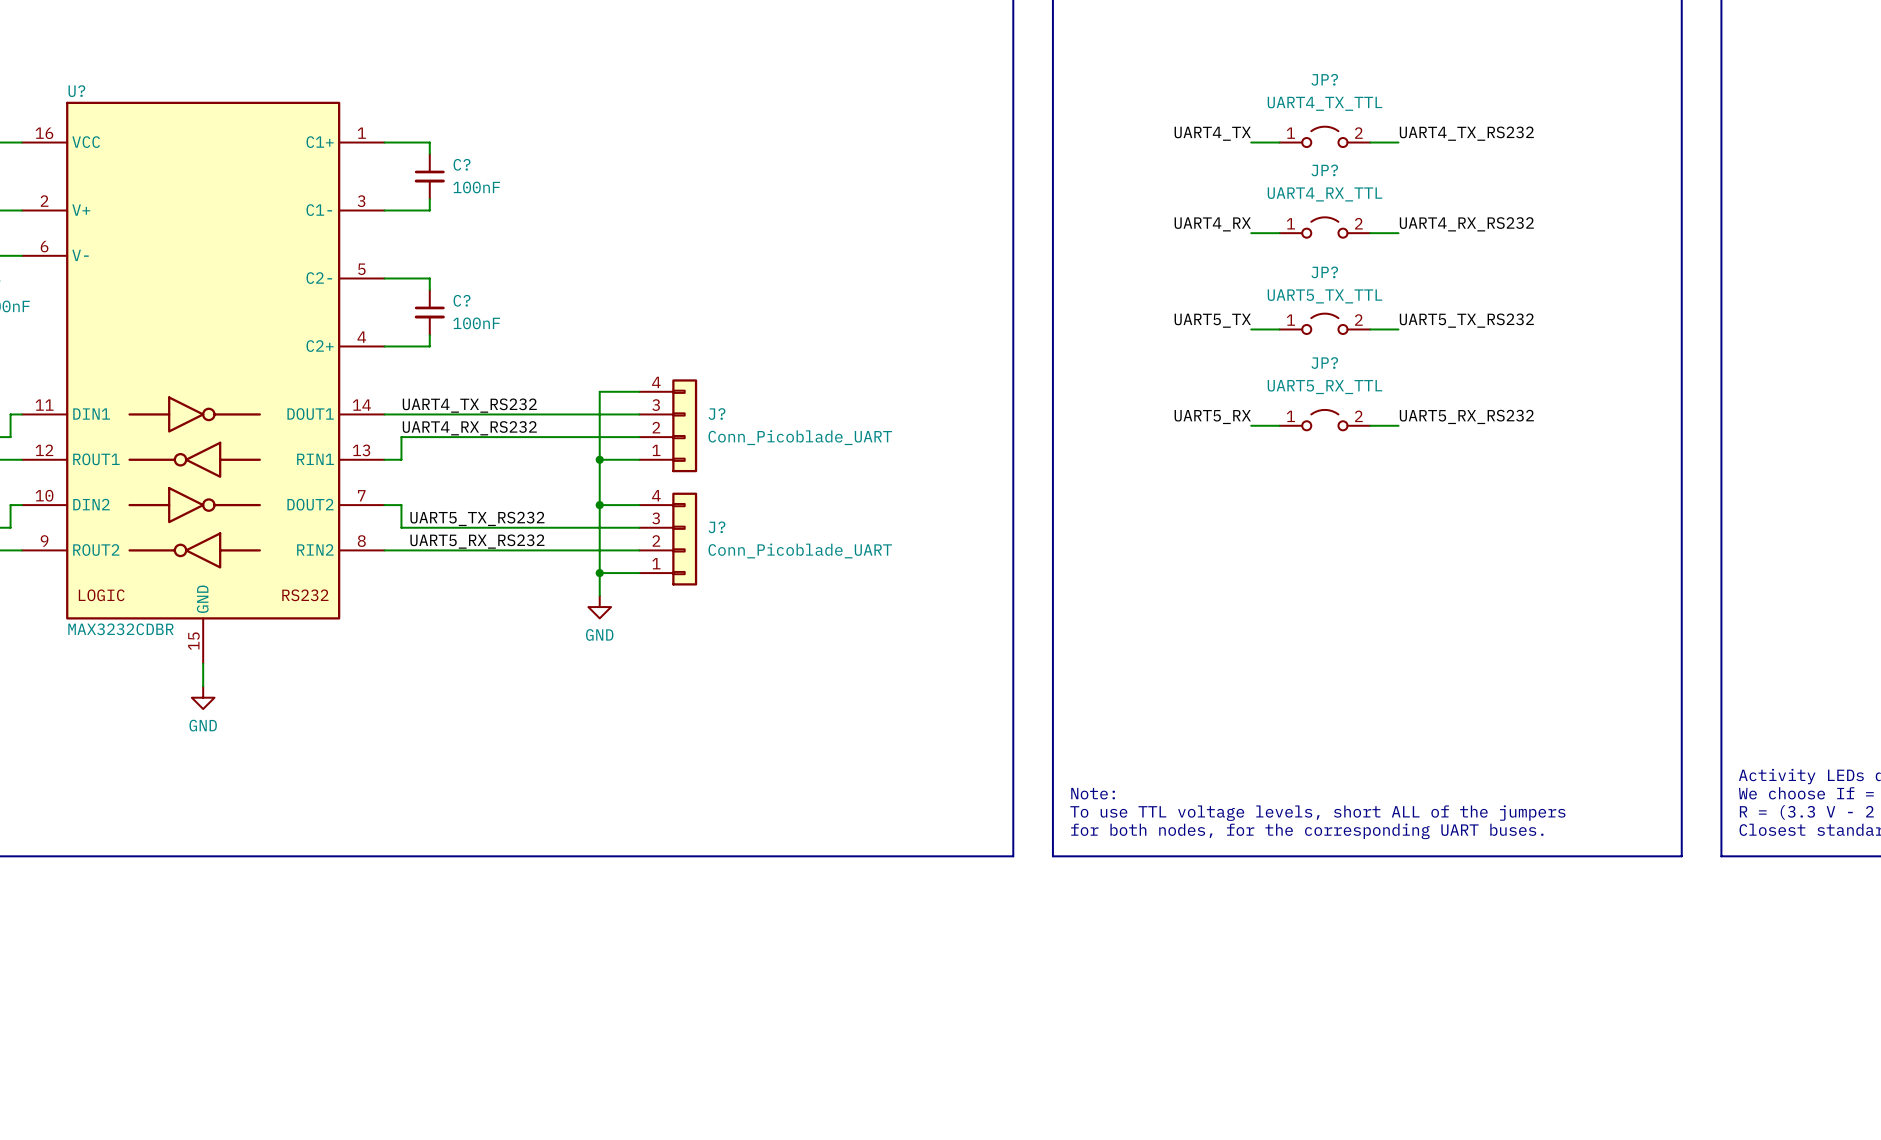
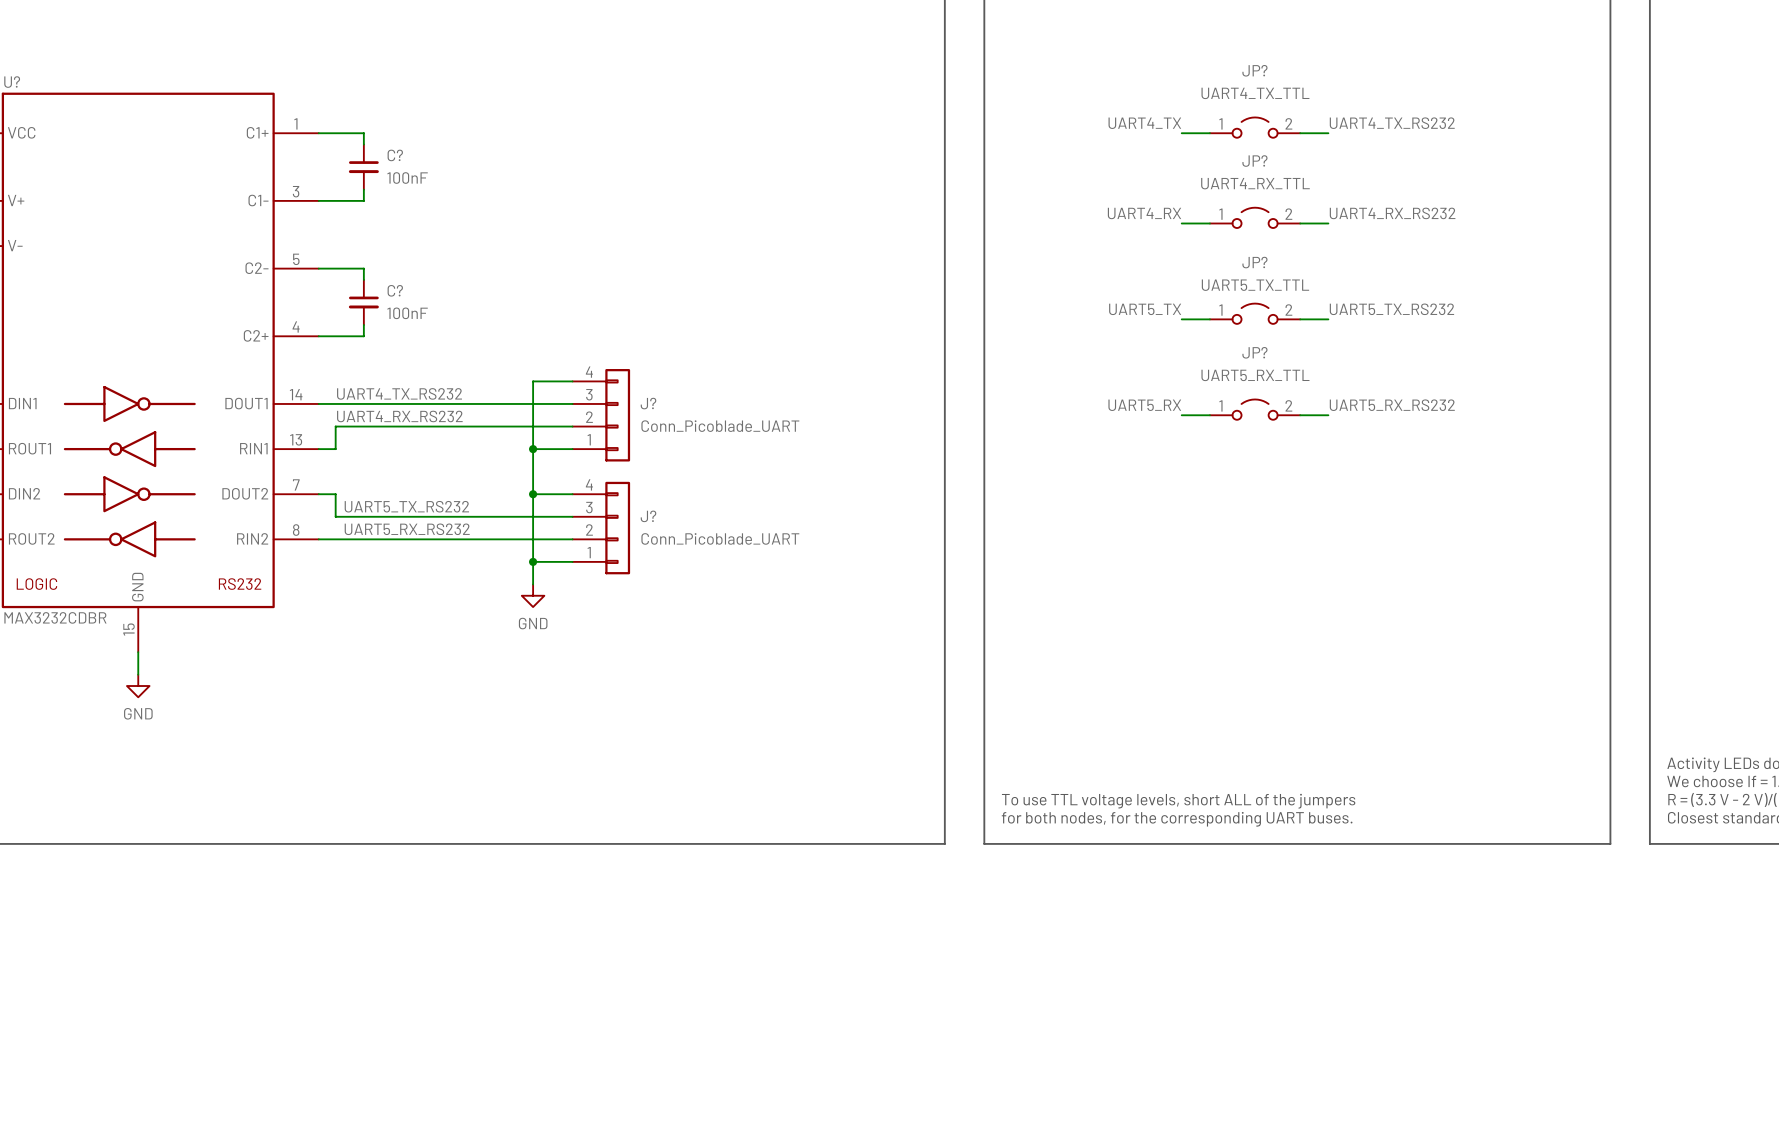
text: Note: (1093, 793) -> none

